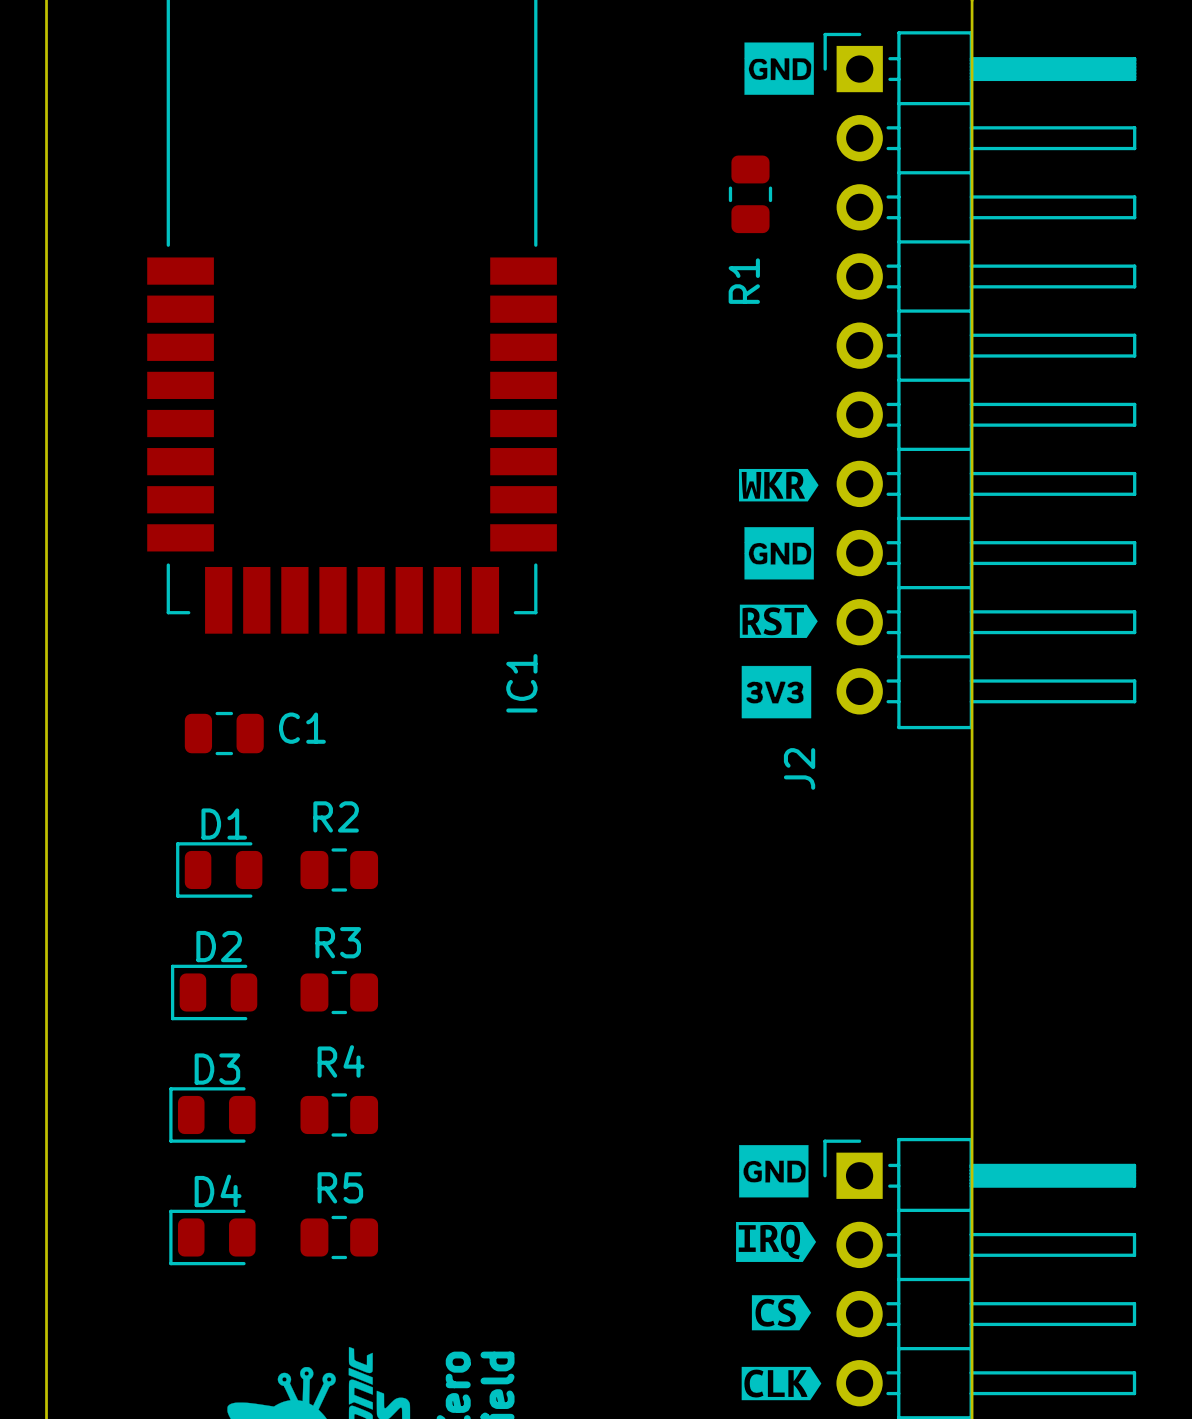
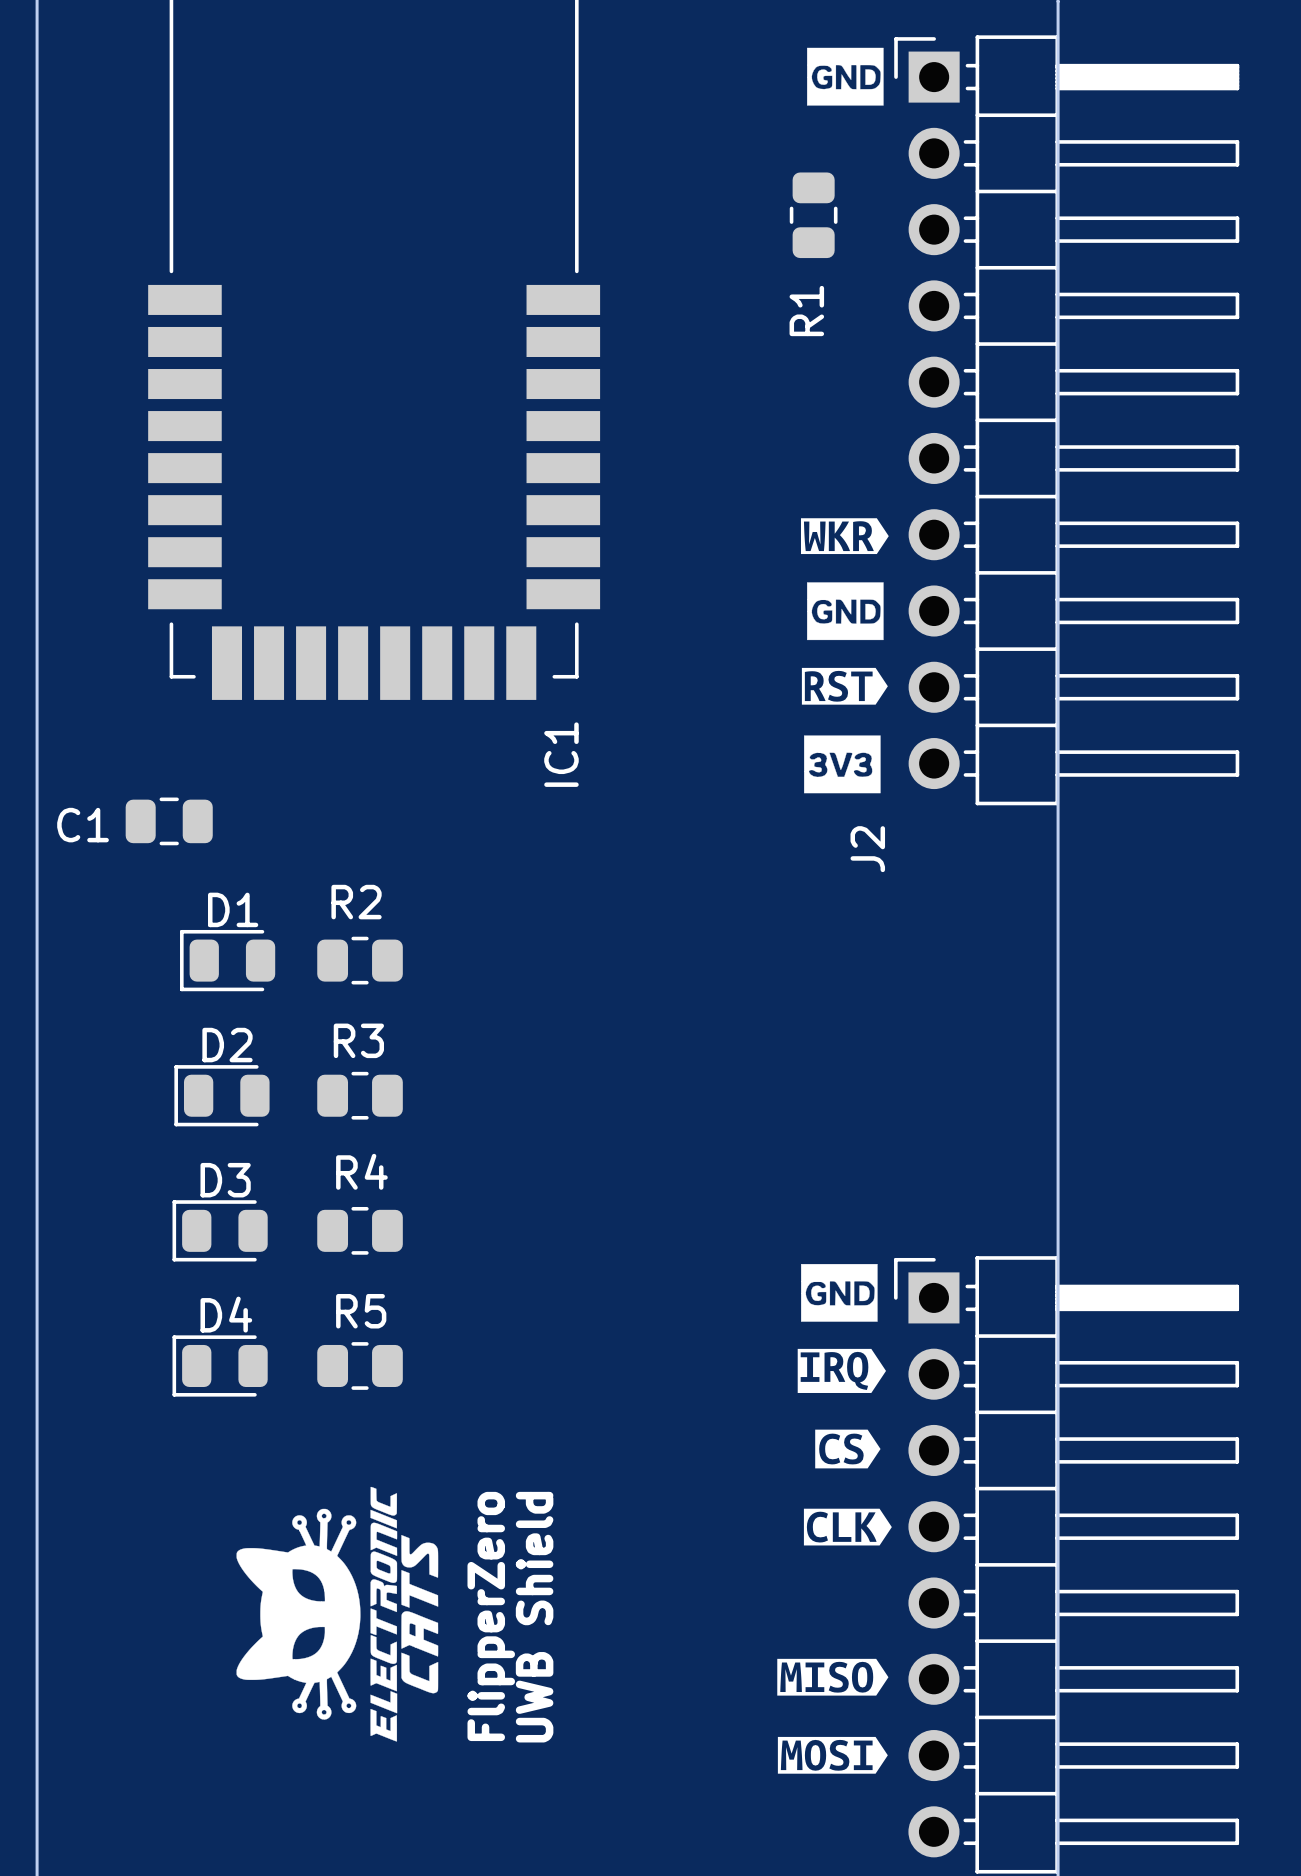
C1 name position: C1 (302, 728) -> C1 (83, 825)
C1 position: (224, 733) -> (169, 821)

